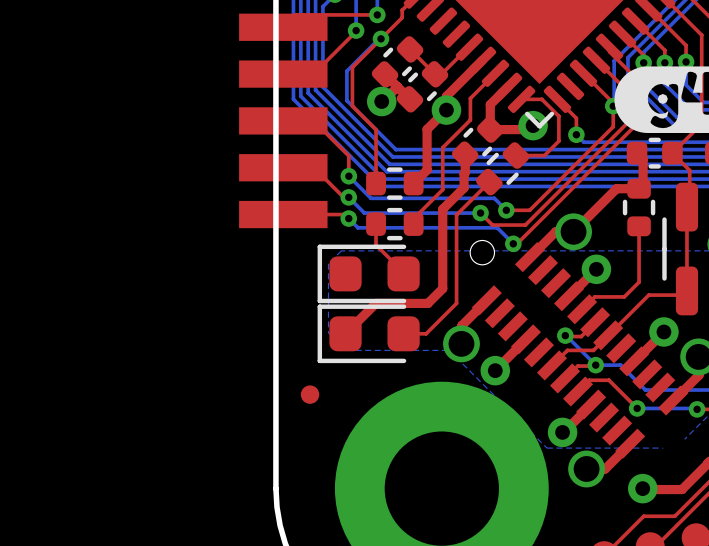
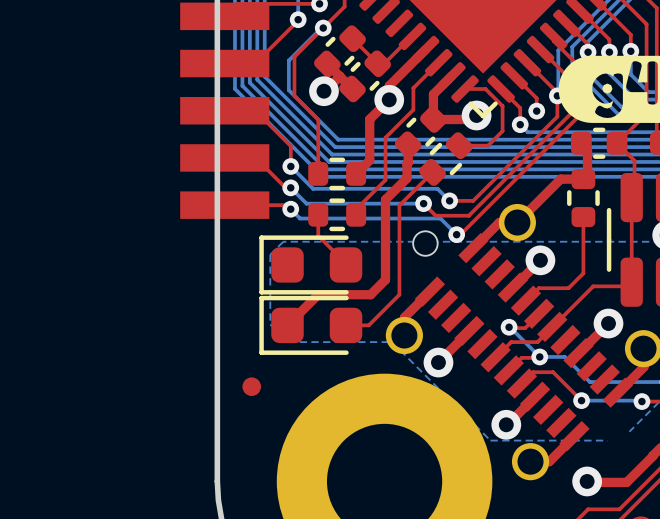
top track: none -> (514, 75) (536, 98) (536, 111)
via: none -> (536, 111)

